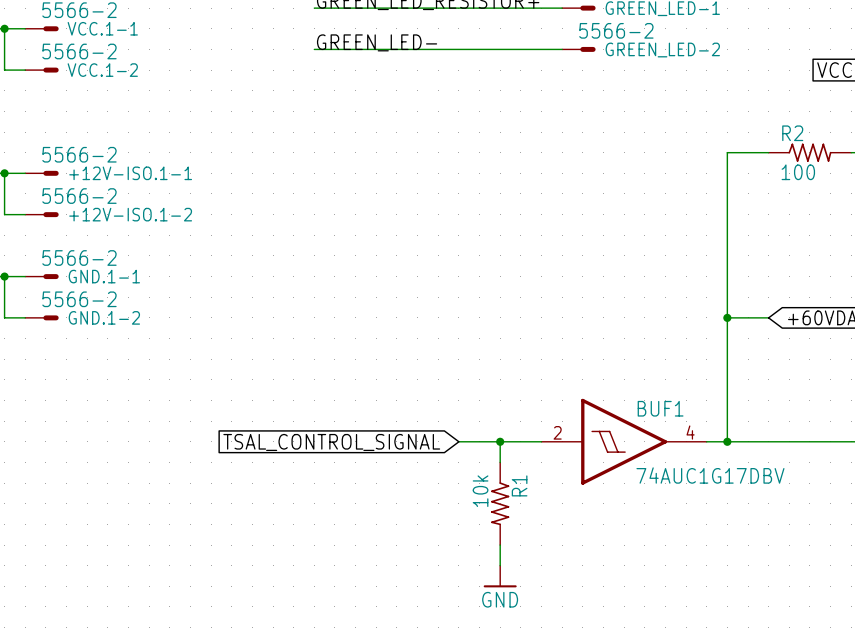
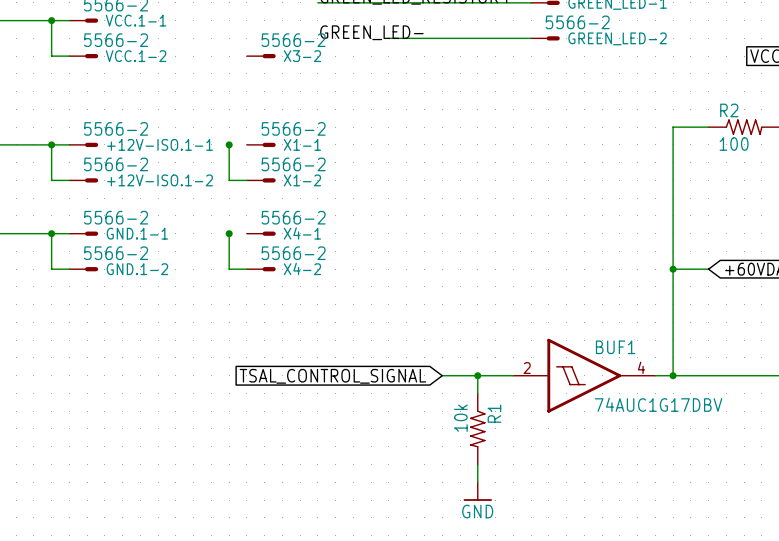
wire: (314, 49) (396, 49) -> none
X3-2: none -> 5566-2 (261, 56)
wire: none -> (229, 144) (229, 180) (246, 180)
junction: none -> (229, 144)
X1-1: none -> 5566-2 (261, 144)
X1-2: none -> 5566-2 (261, 180)
wire: none -> (229, 233) (229, 269) (246, 269)
junction: none -> (229, 233)
X4-1: none -> 5566-2 (261, 233)
X4-2: none -> 5566-2 (261, 269)

